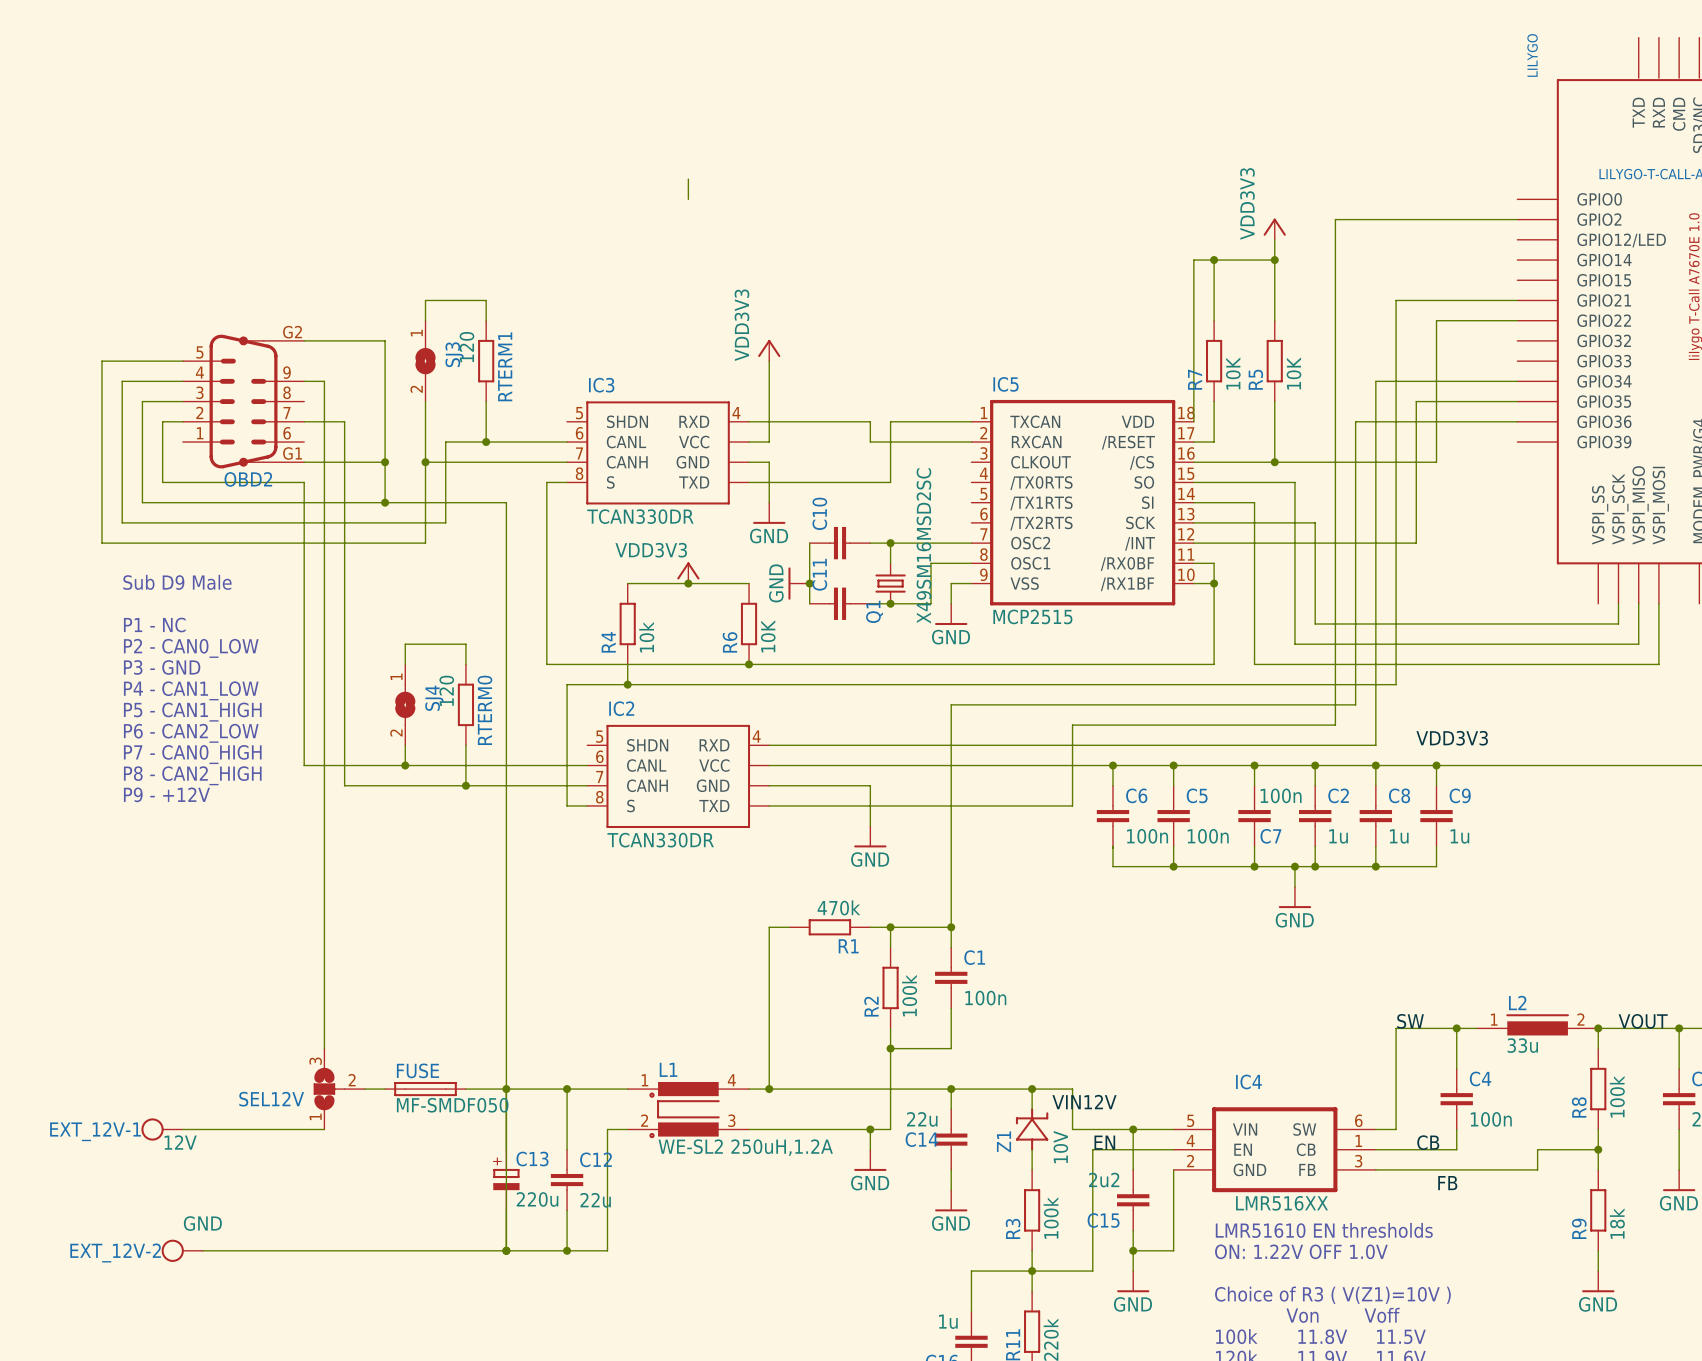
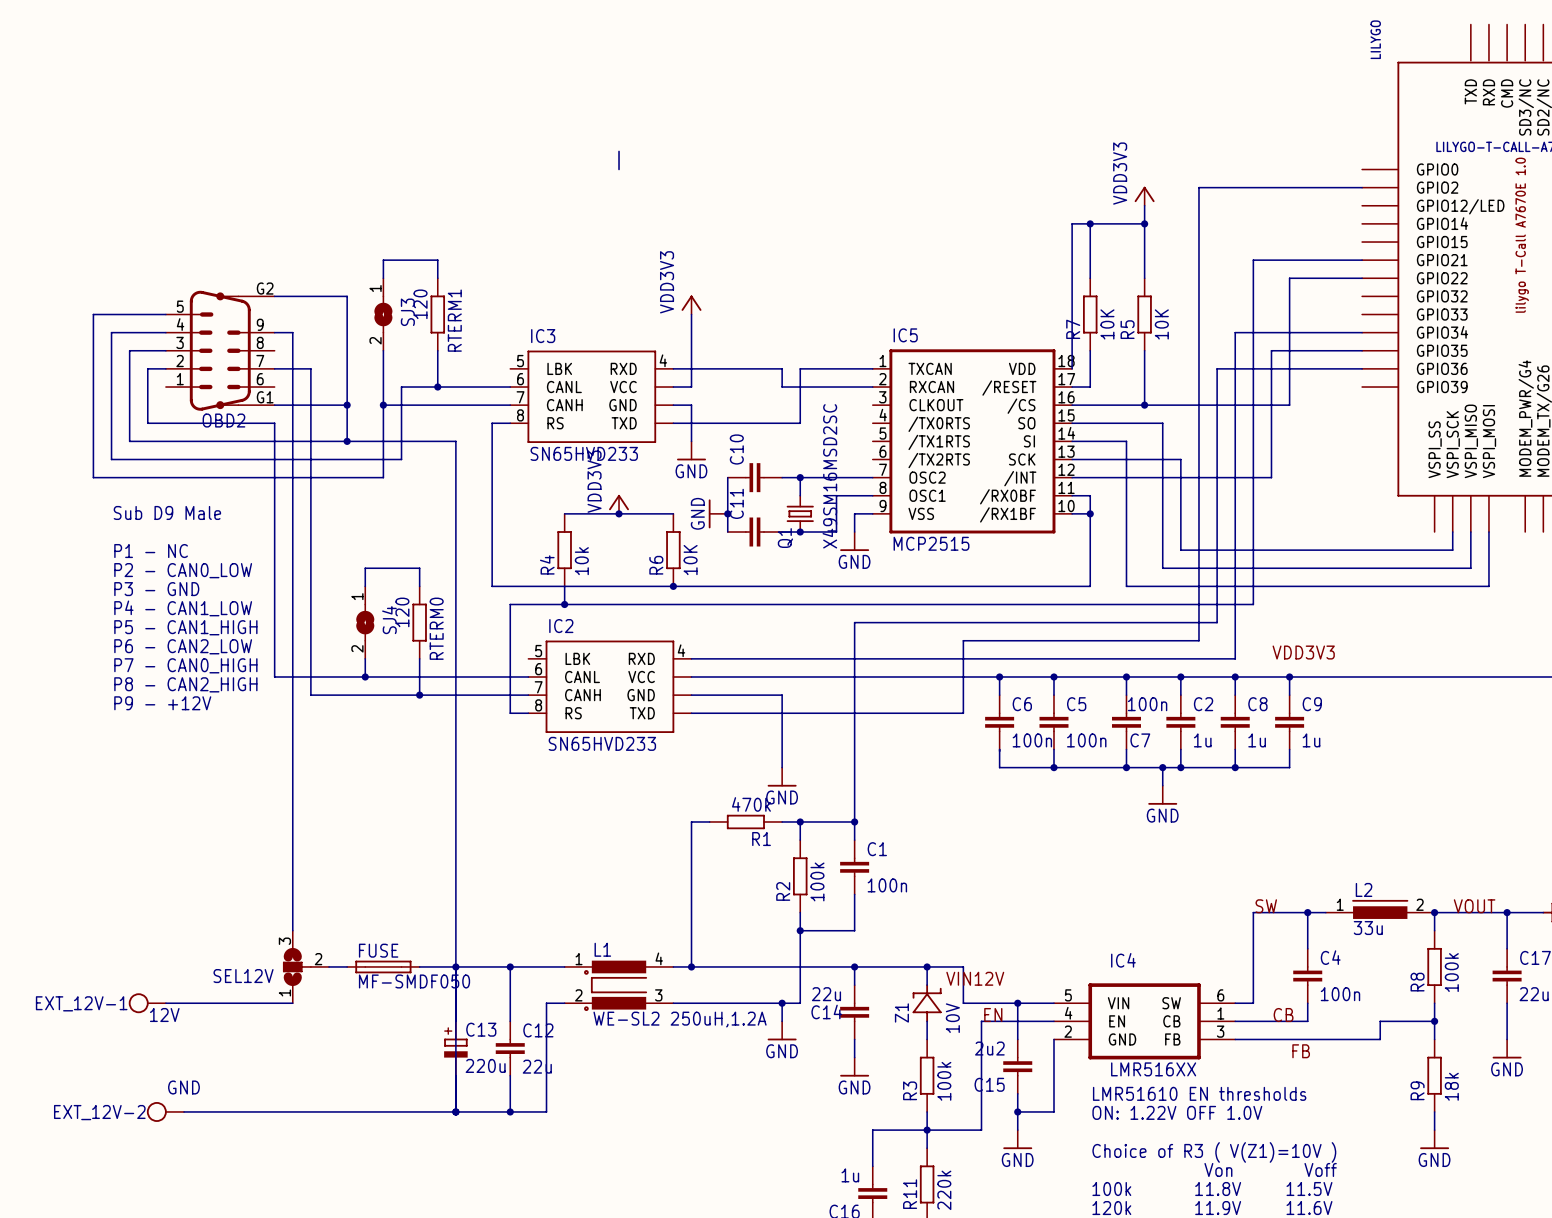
IC3 pin name: SHDN (627, 421) -> LBK (559, 368)
IC3 pin name: S (610, 482) -> RS (555, 423)
IC3 value: TCAN330DR (640, 516) -> SN65HVD233 (584, 453)
power symbol text rotation: 0° (651, 550) -> 90° counterclockwise (594, 481)
IC2 pin name: SHDN (647, 745) -> LBK (577, 658)
IC2 pin name: S (631, 805) -> RS (573, 713)
power symbol position: GND (870, 836) -> GND (782, 777)
IC2 value: TCAN330DR (660, 840) -> SN65HVD233 (602, 743)

